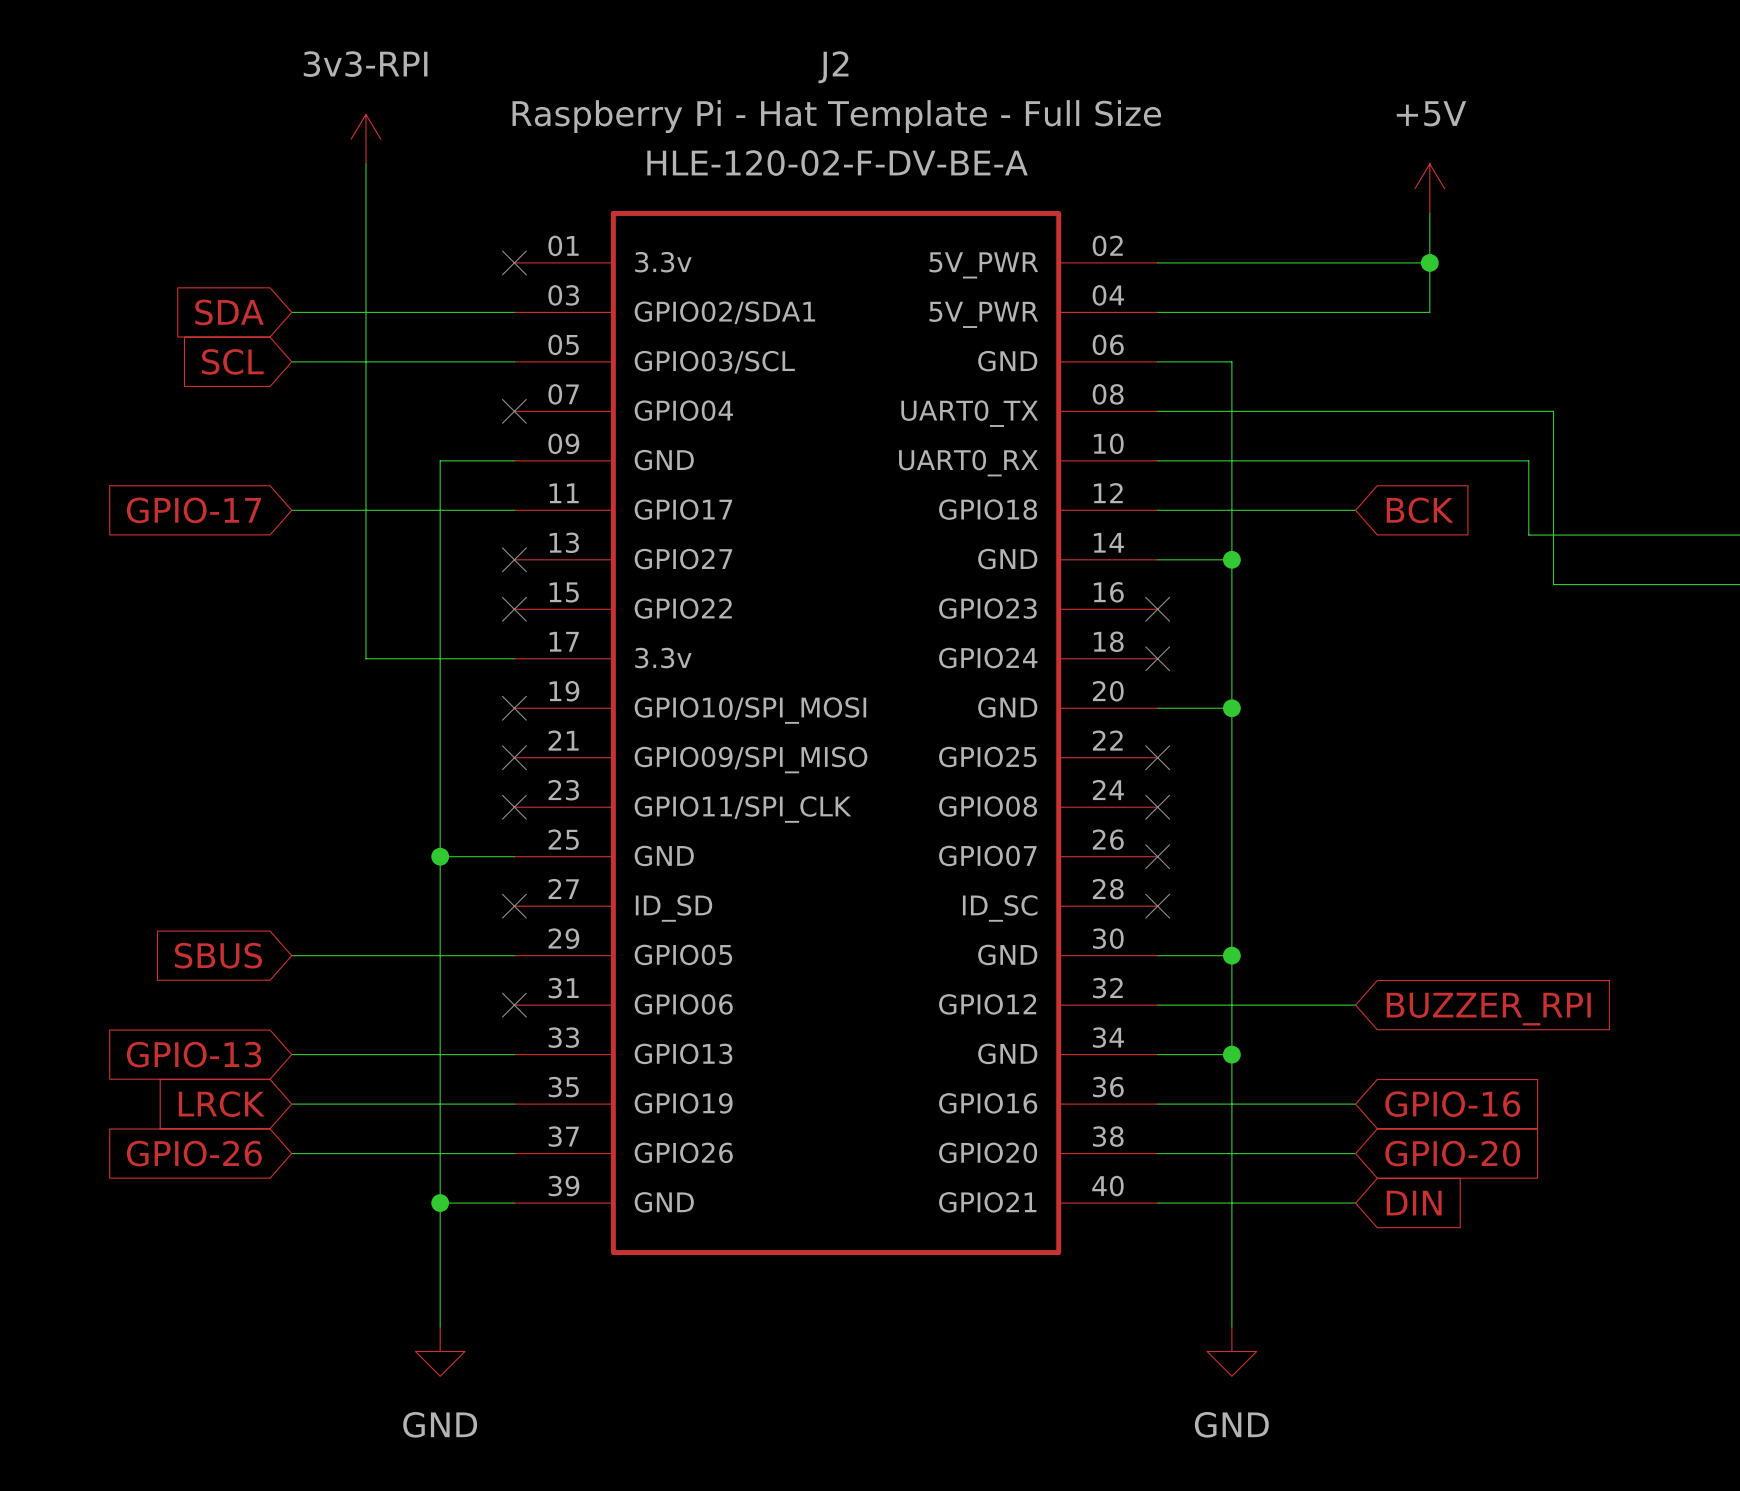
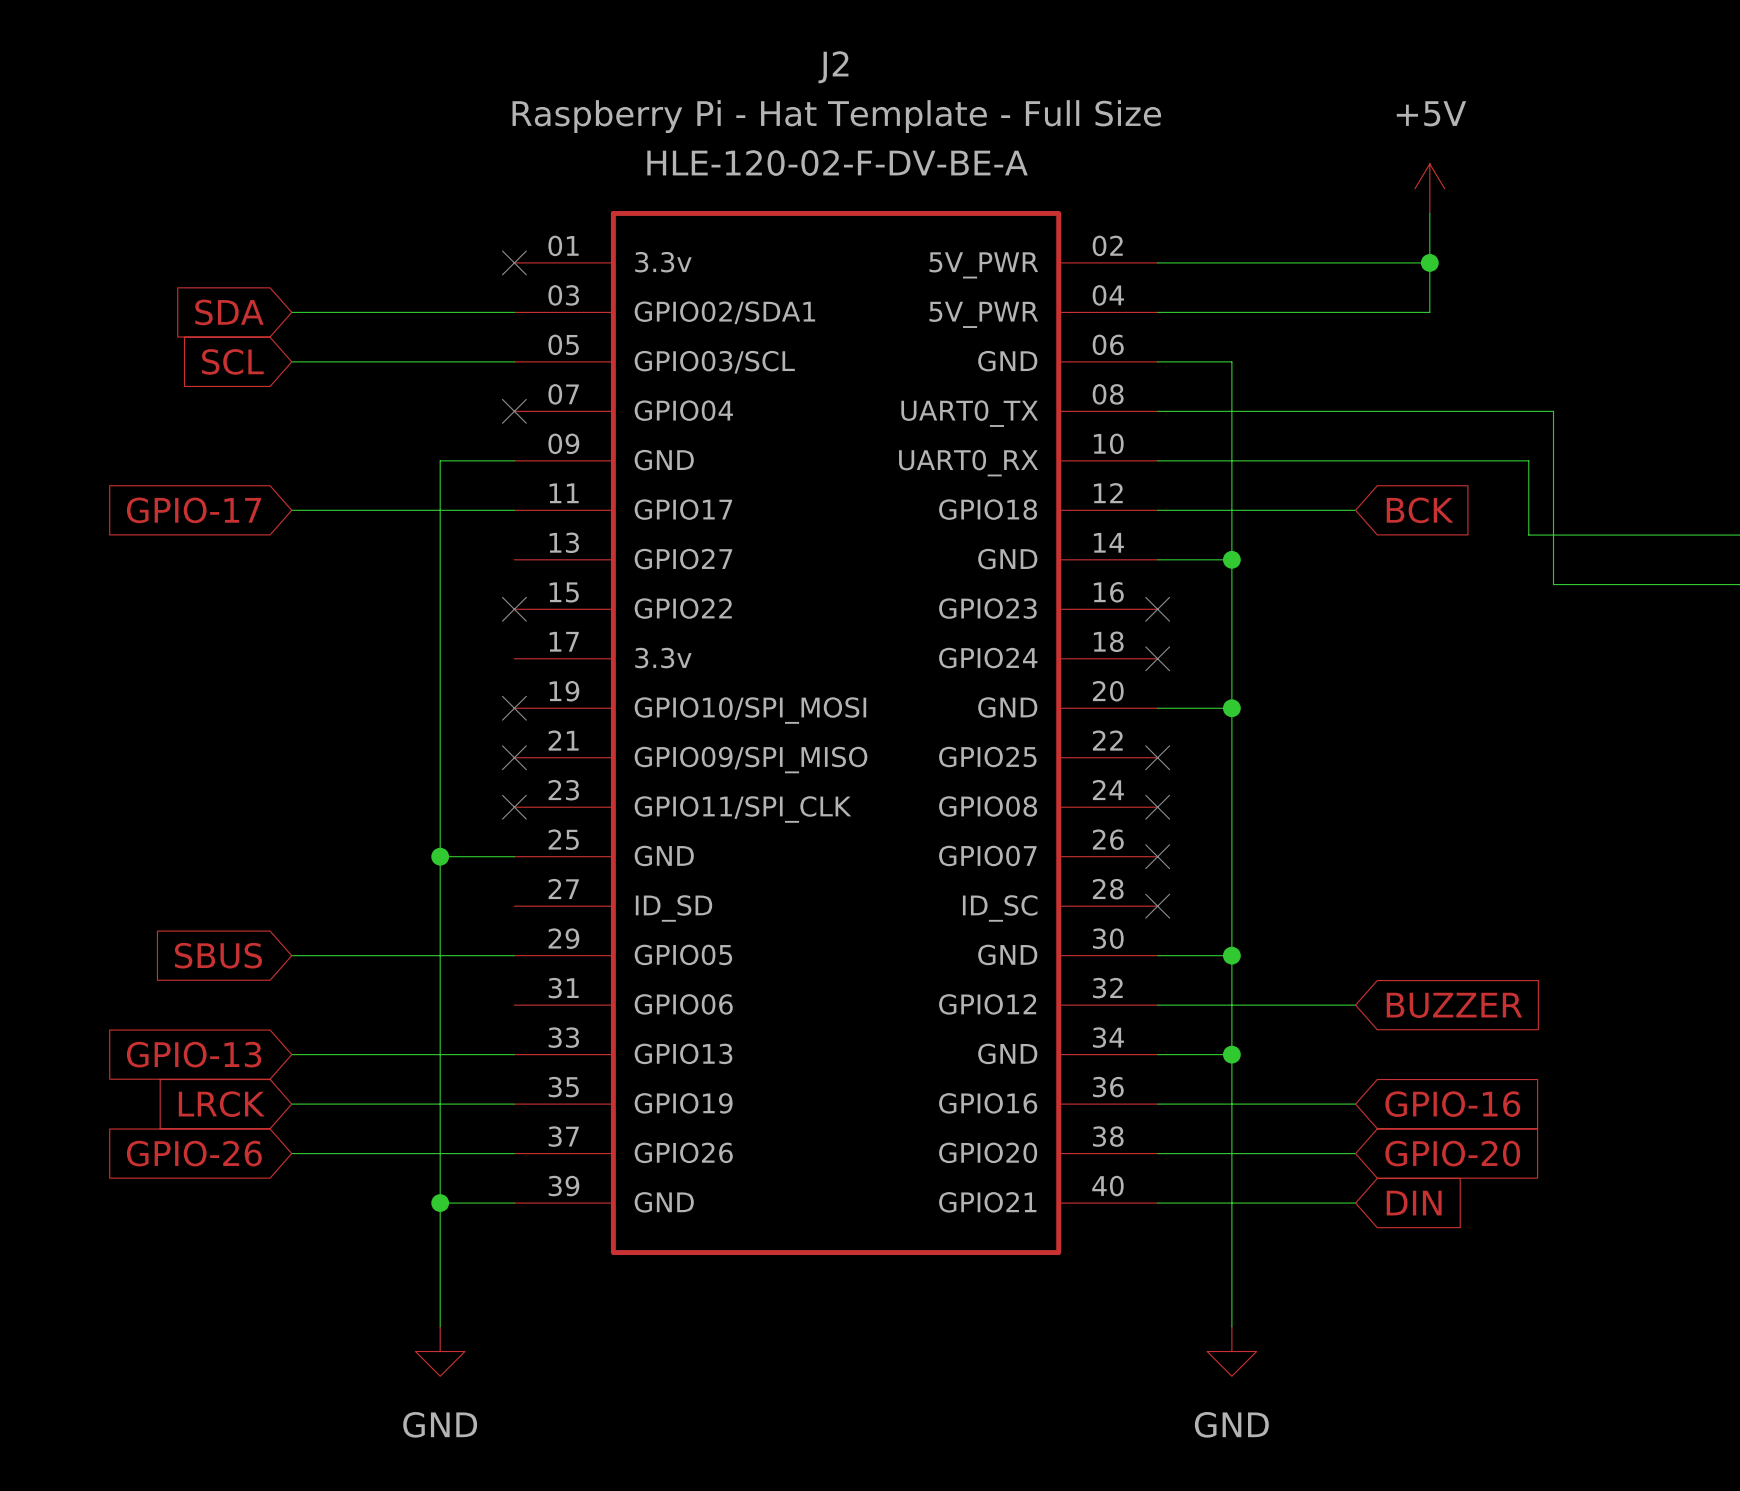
power symbol: 3v3-RPI (365, 139) -> none
wire: (365, 163) (365, 658) (514, 658) -> none
no-connect mark: (514, 559) -> none
no-connect mark: (514, 906) -> none
no-connect mark: (514, 1005) -> none
global label: BUZZER_RPI (1488, 1009) -> BUZZER (1454, 1005)

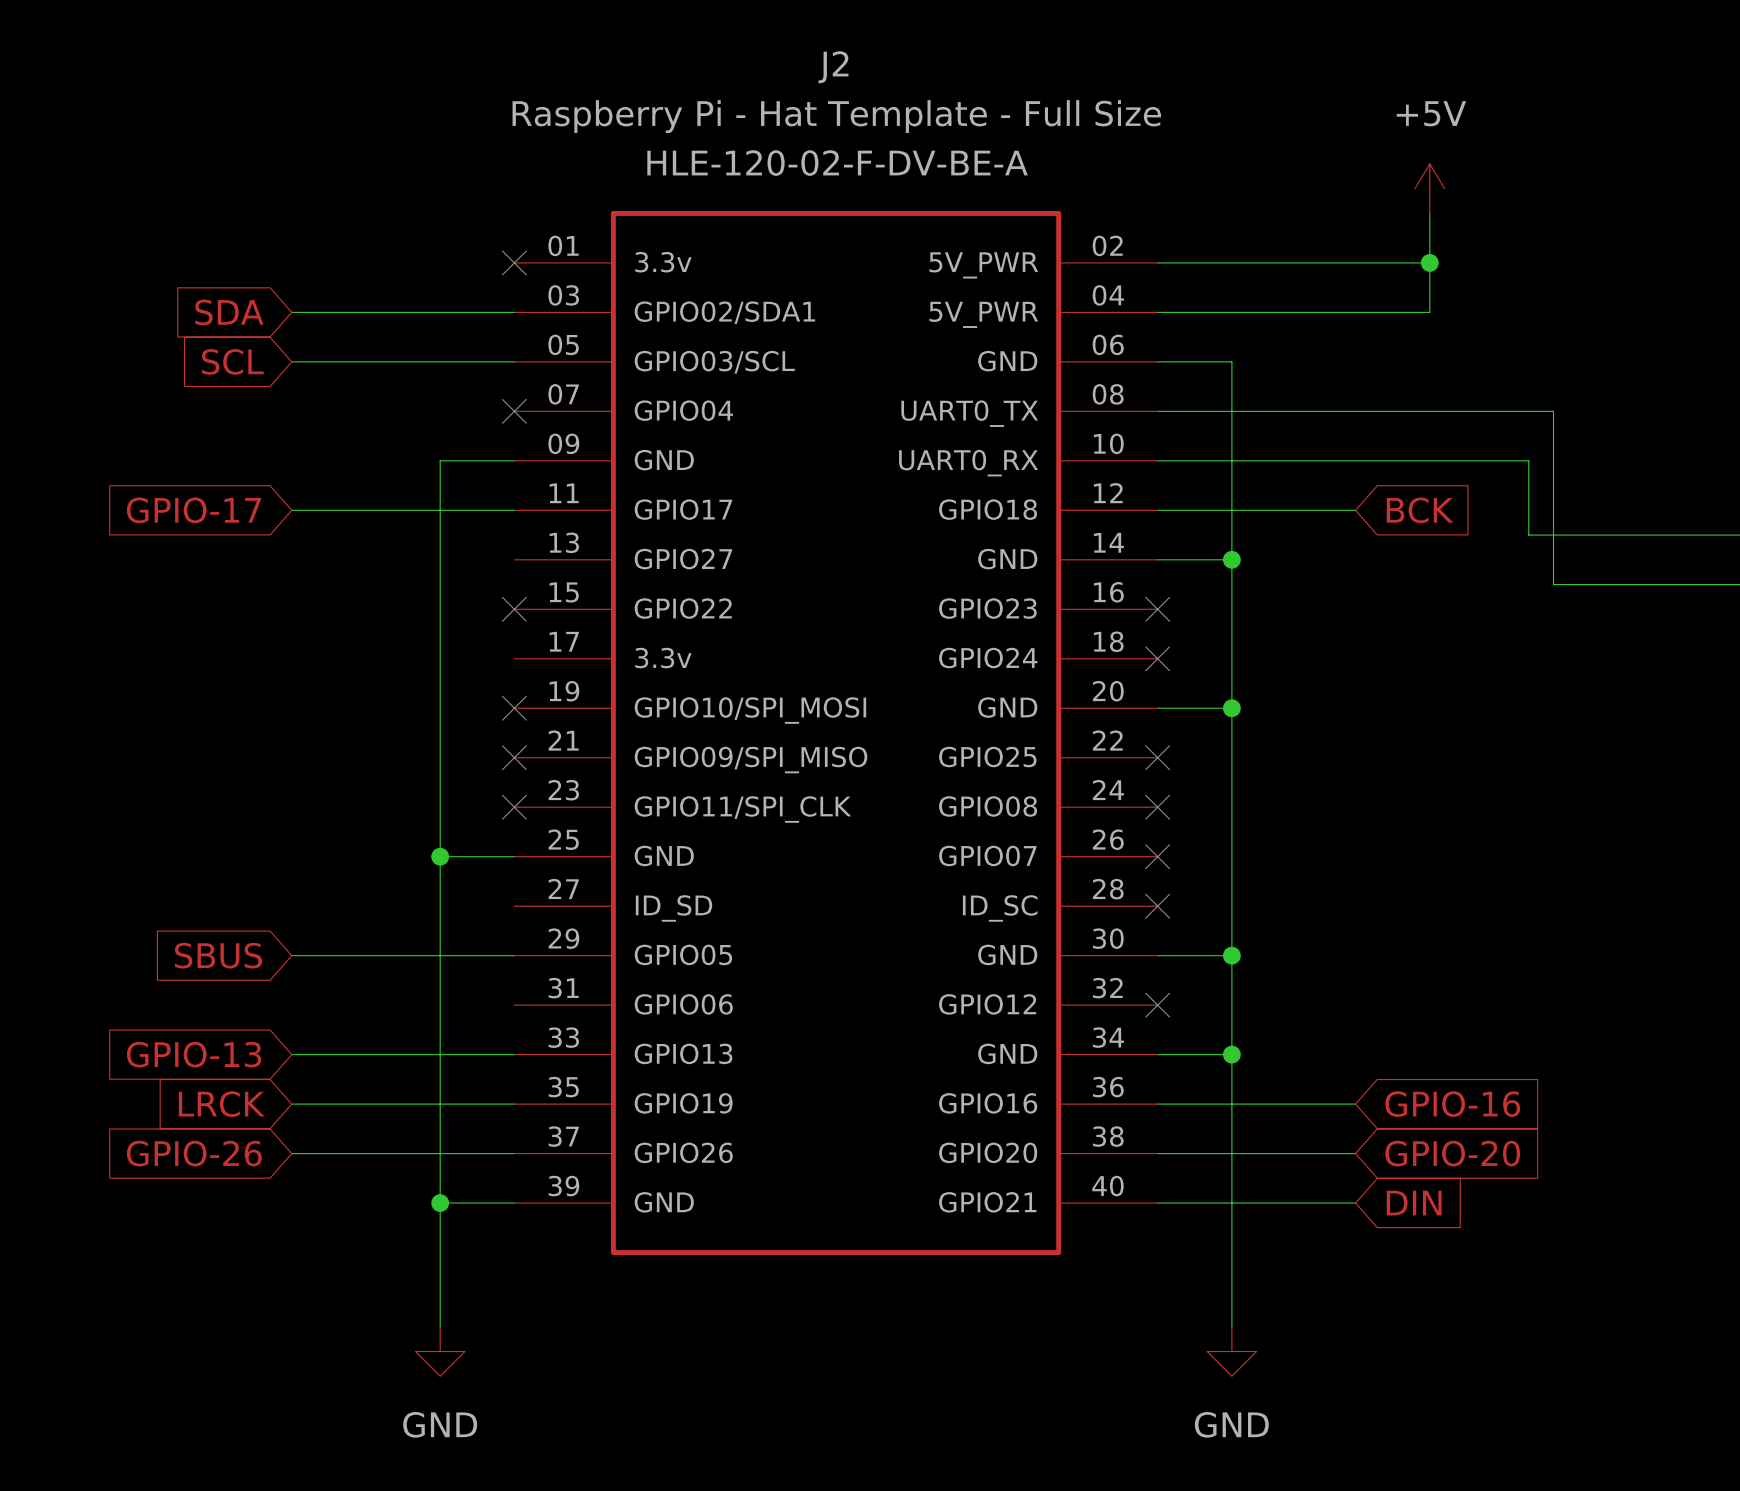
wire: (1157, 1005) (1355, 1005) -> none
no-connect mark: none -> (1157, 1005)
global label: BUZZER (1454, 1005) -> none

